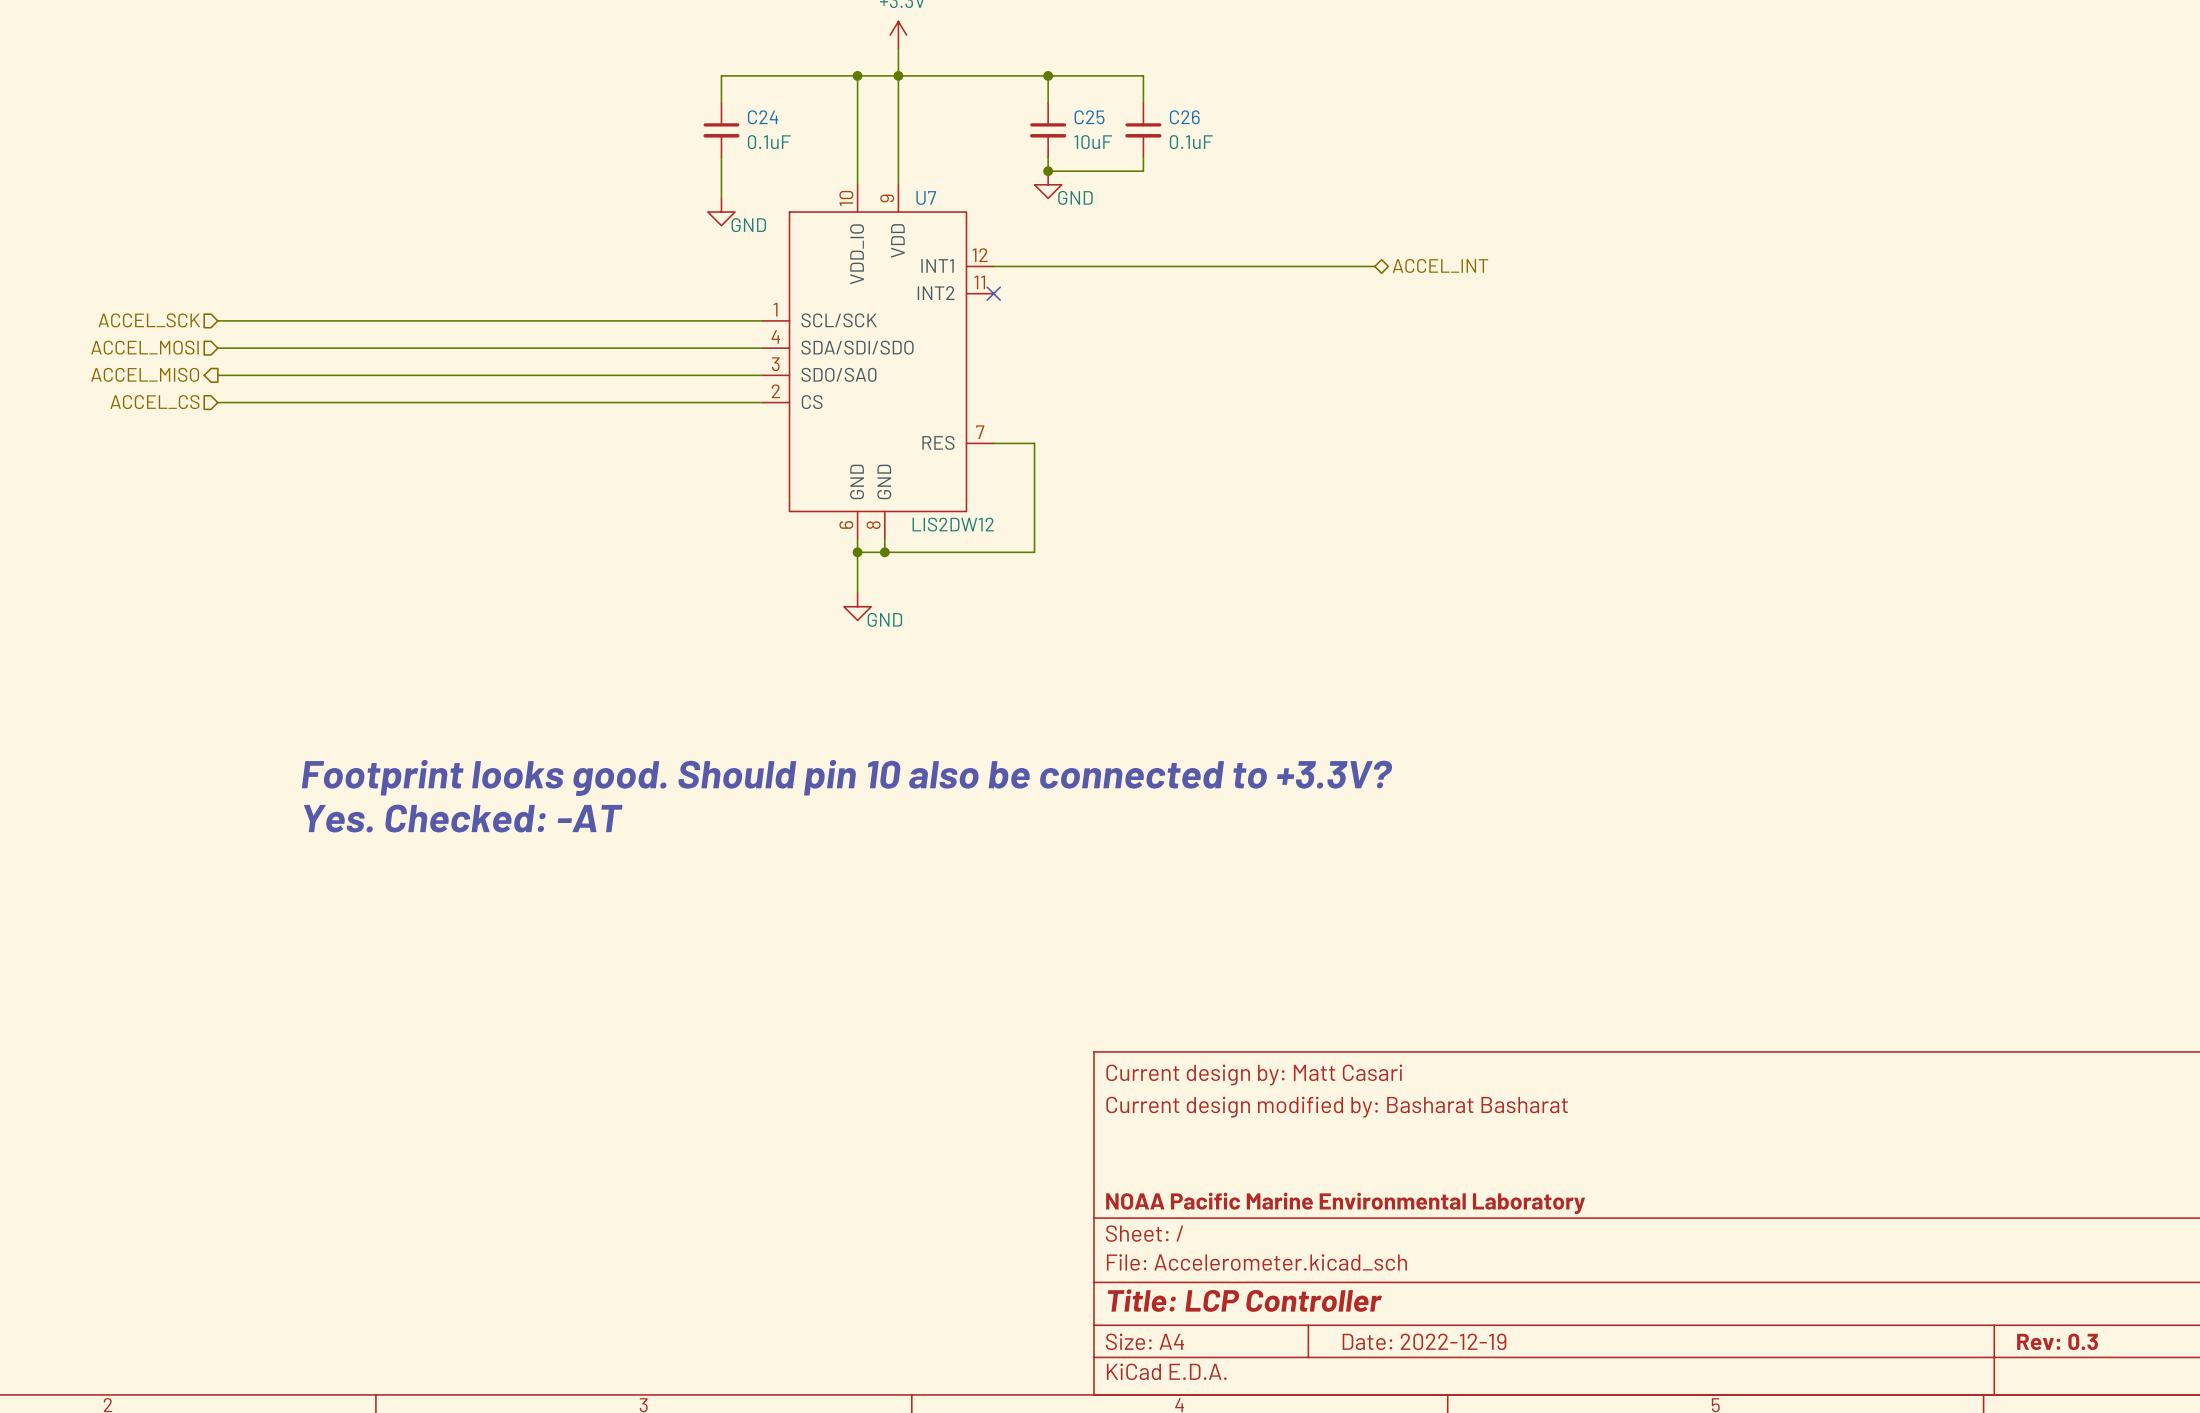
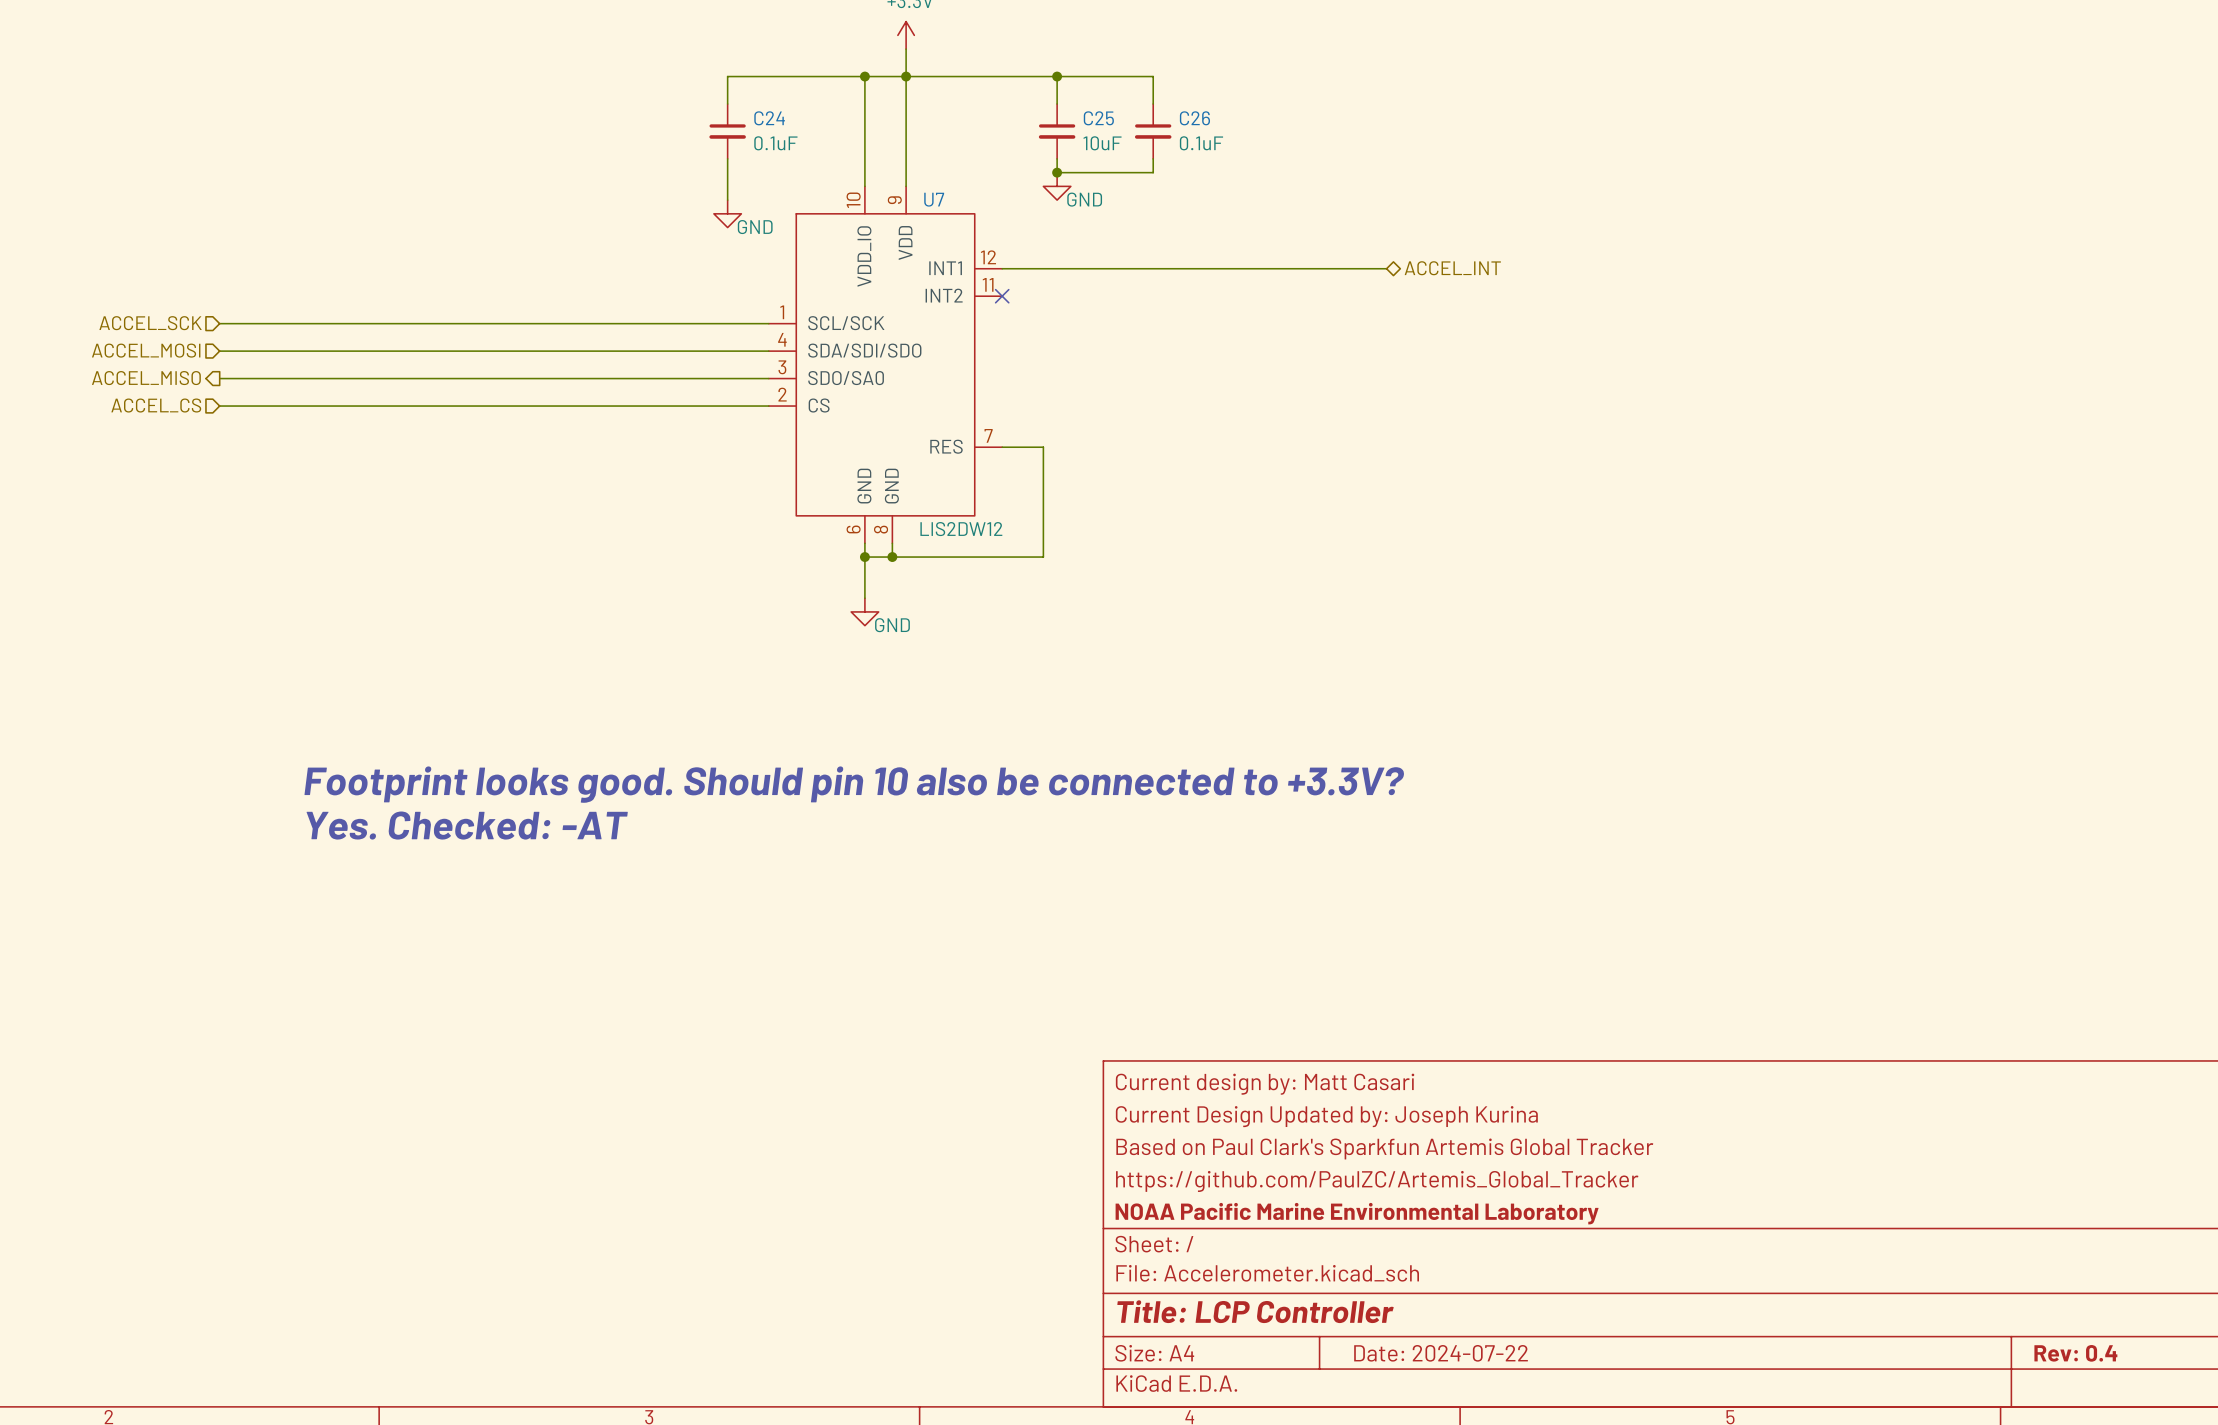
title block: Current design modified by: Basharat Basharat (1337, 1107) -> Current Design Updated by: Joseph Kurina (1326, 1116)
title block: none -> Based on Paul Clark's Sparkfun Artemis Global Tracker (1384, 1148)
title block: none -> https://github.com/PaulZC/Artemis_Global_Tracker (1377, 1181)
title block: Date: 2022-12-19 (1424, 1341) -> Date: 2024-07-22 (1441, 1353)
title block: Rev: 0.3 (2057, 1341) -> Rev: 0.4 (2075, 1353)

